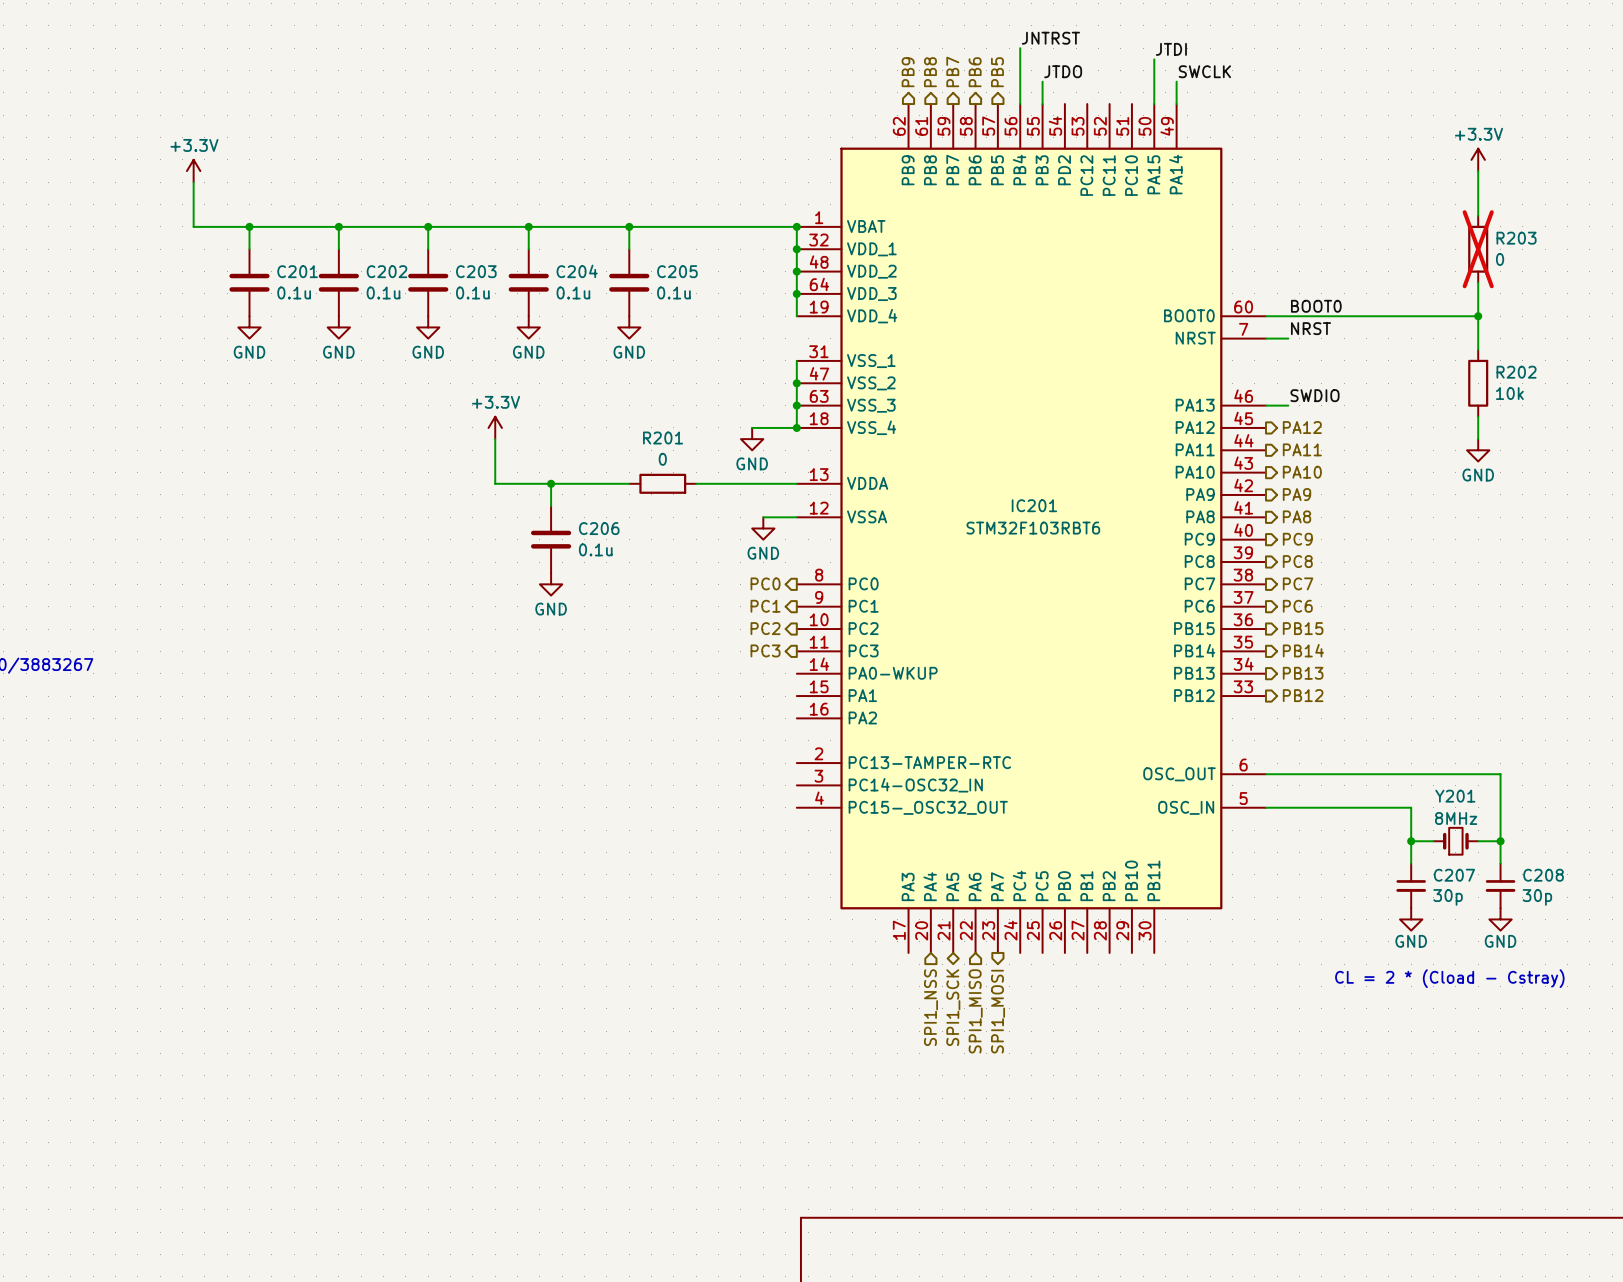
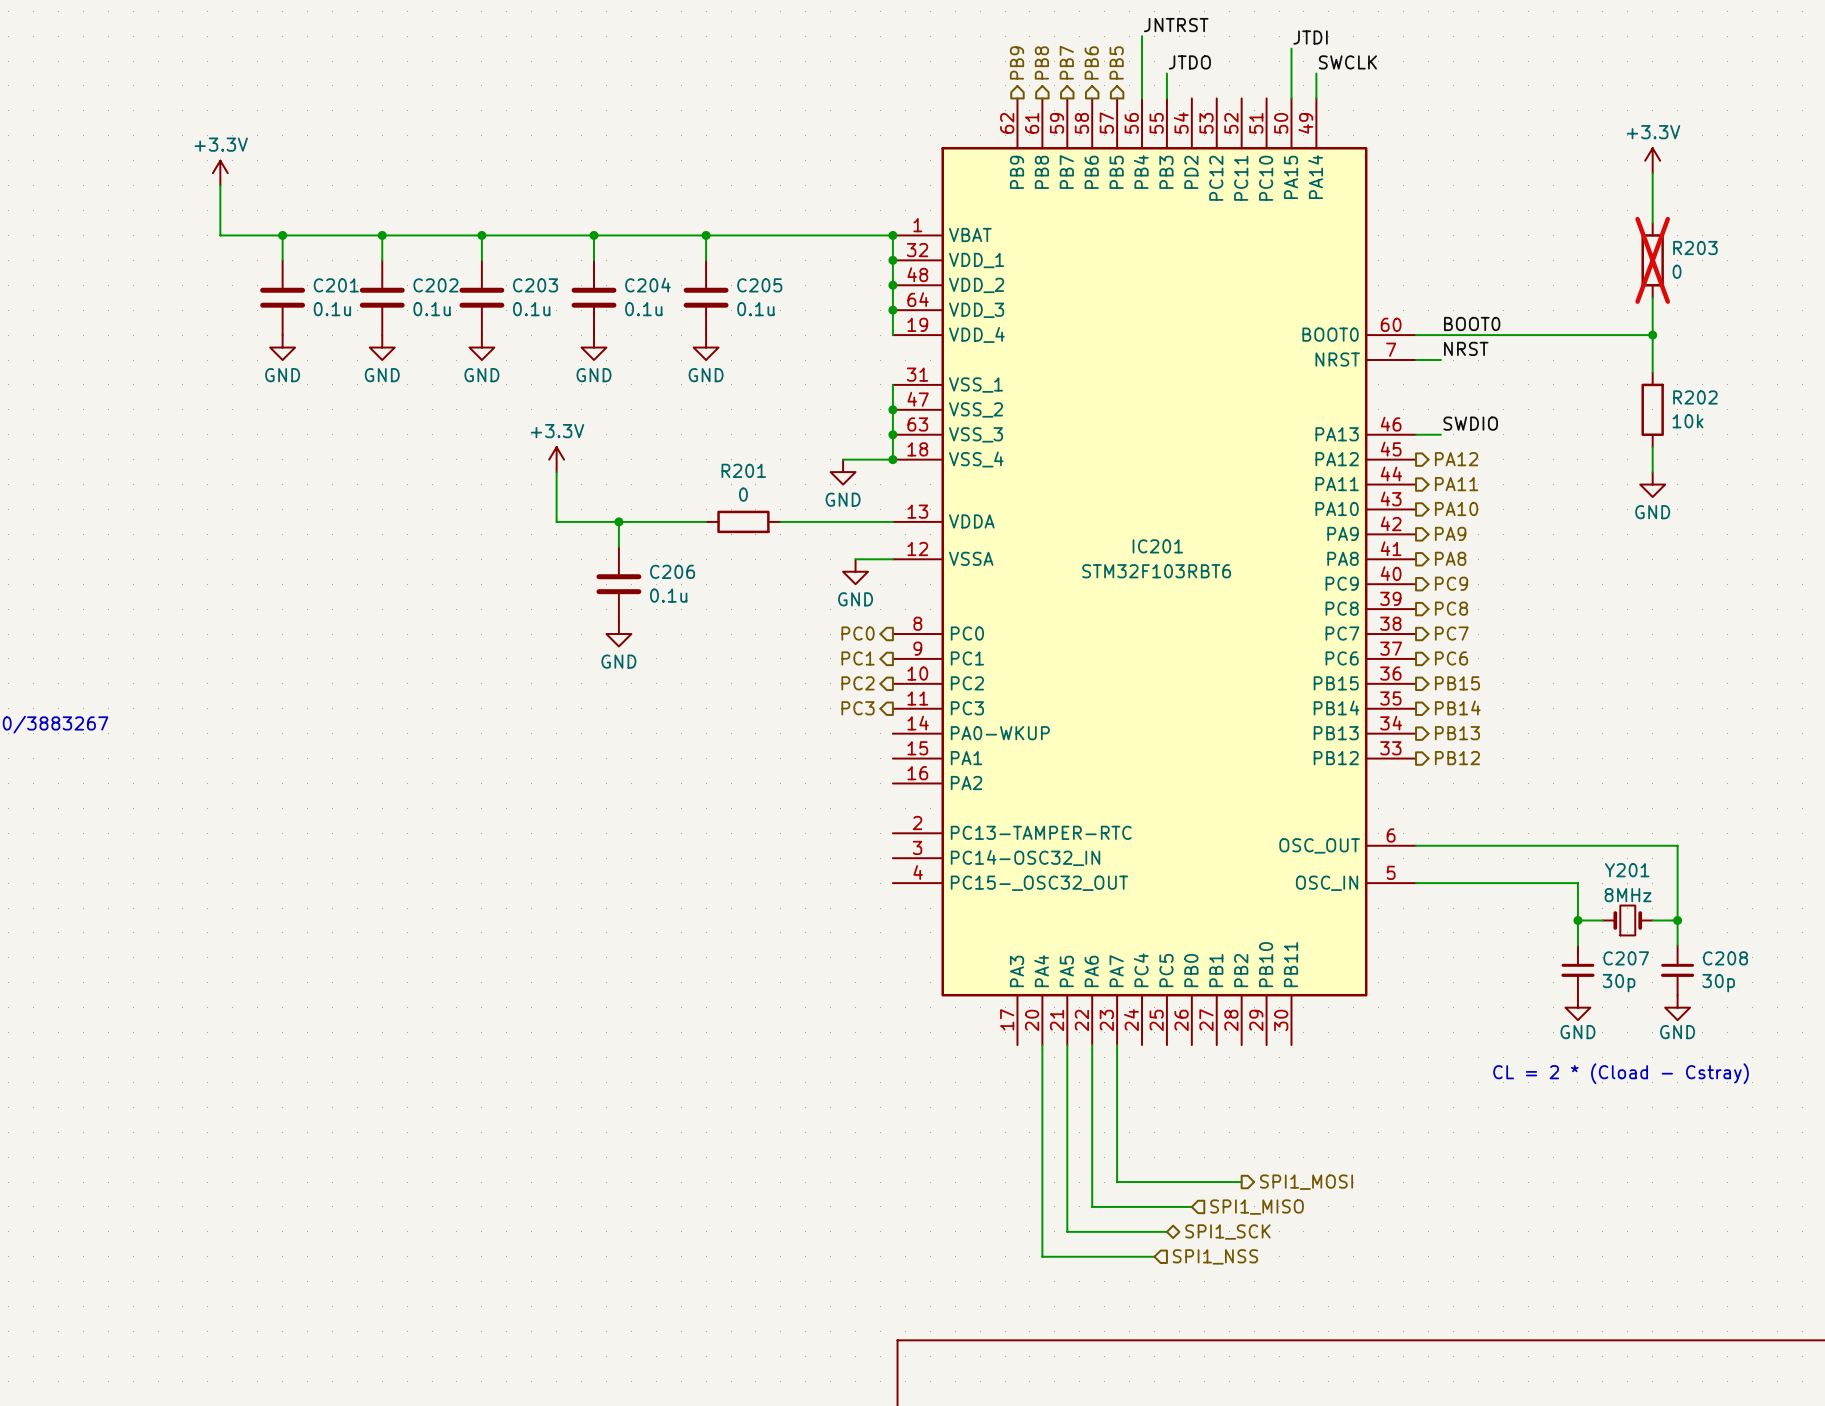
wire: none -> (1042, 1045) (1042, 1256) (1154, 1256)
wire: none -> (1067, 1045) (1067, 1231) (1166, 1231)
wire: none -> (1092, 1045) (1092, 1206) (1191, 1206)
wire: none -> (1117, 1045) (1117, 1182) (1241, 1182)
hierarchical label rotation: 0° (930, 1007) -> 90° counterclockwise (1215, 1256)
hierarchical label position: SPI1_NSS (930, 1007) -> SPI1_NSS (1215, 1256)
hierarchical label rotation: 0° (953, 1007) -> 90° counterclockwise (1227, 1231)
hierarchical label position: SPI1_SCK (953, 1007) -> SPI1_SCK (1227, 1231)
hierarchical label rotation: 0° (975, 1011) -> 90° counterclockwise (1256, 1207)
hierarchical label position: SPI1_MISO (975, 1011) -> SPI1_MISO (1256, 1207)
hierarchical label rotation: 0° (998, 1011) -> 90° counterclockwise (1306, 1182)
hierarchical label position: SPI1_MOSI (998, 1011) -> SPI1_MOSI (1306, 1182)

